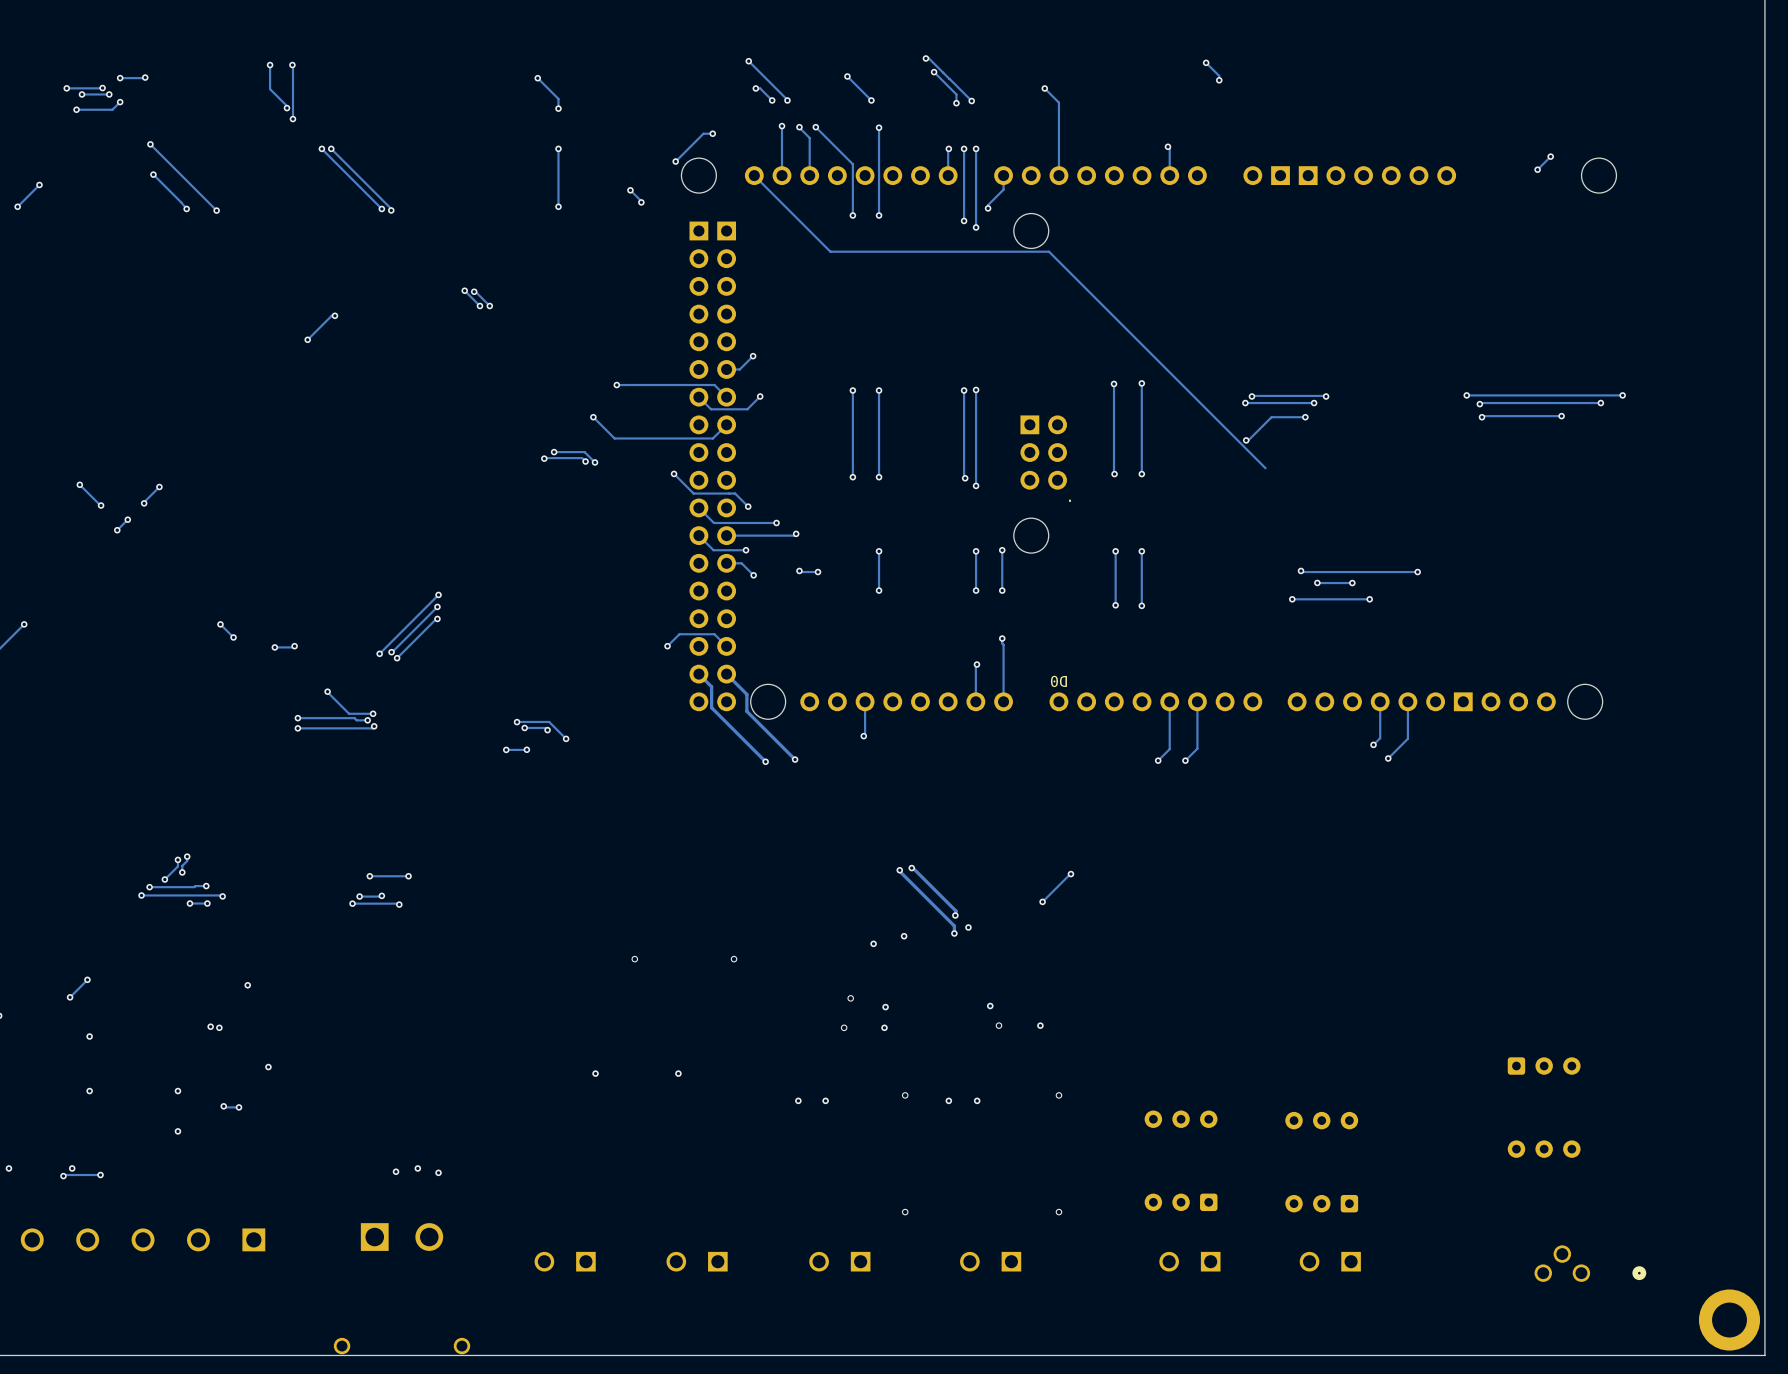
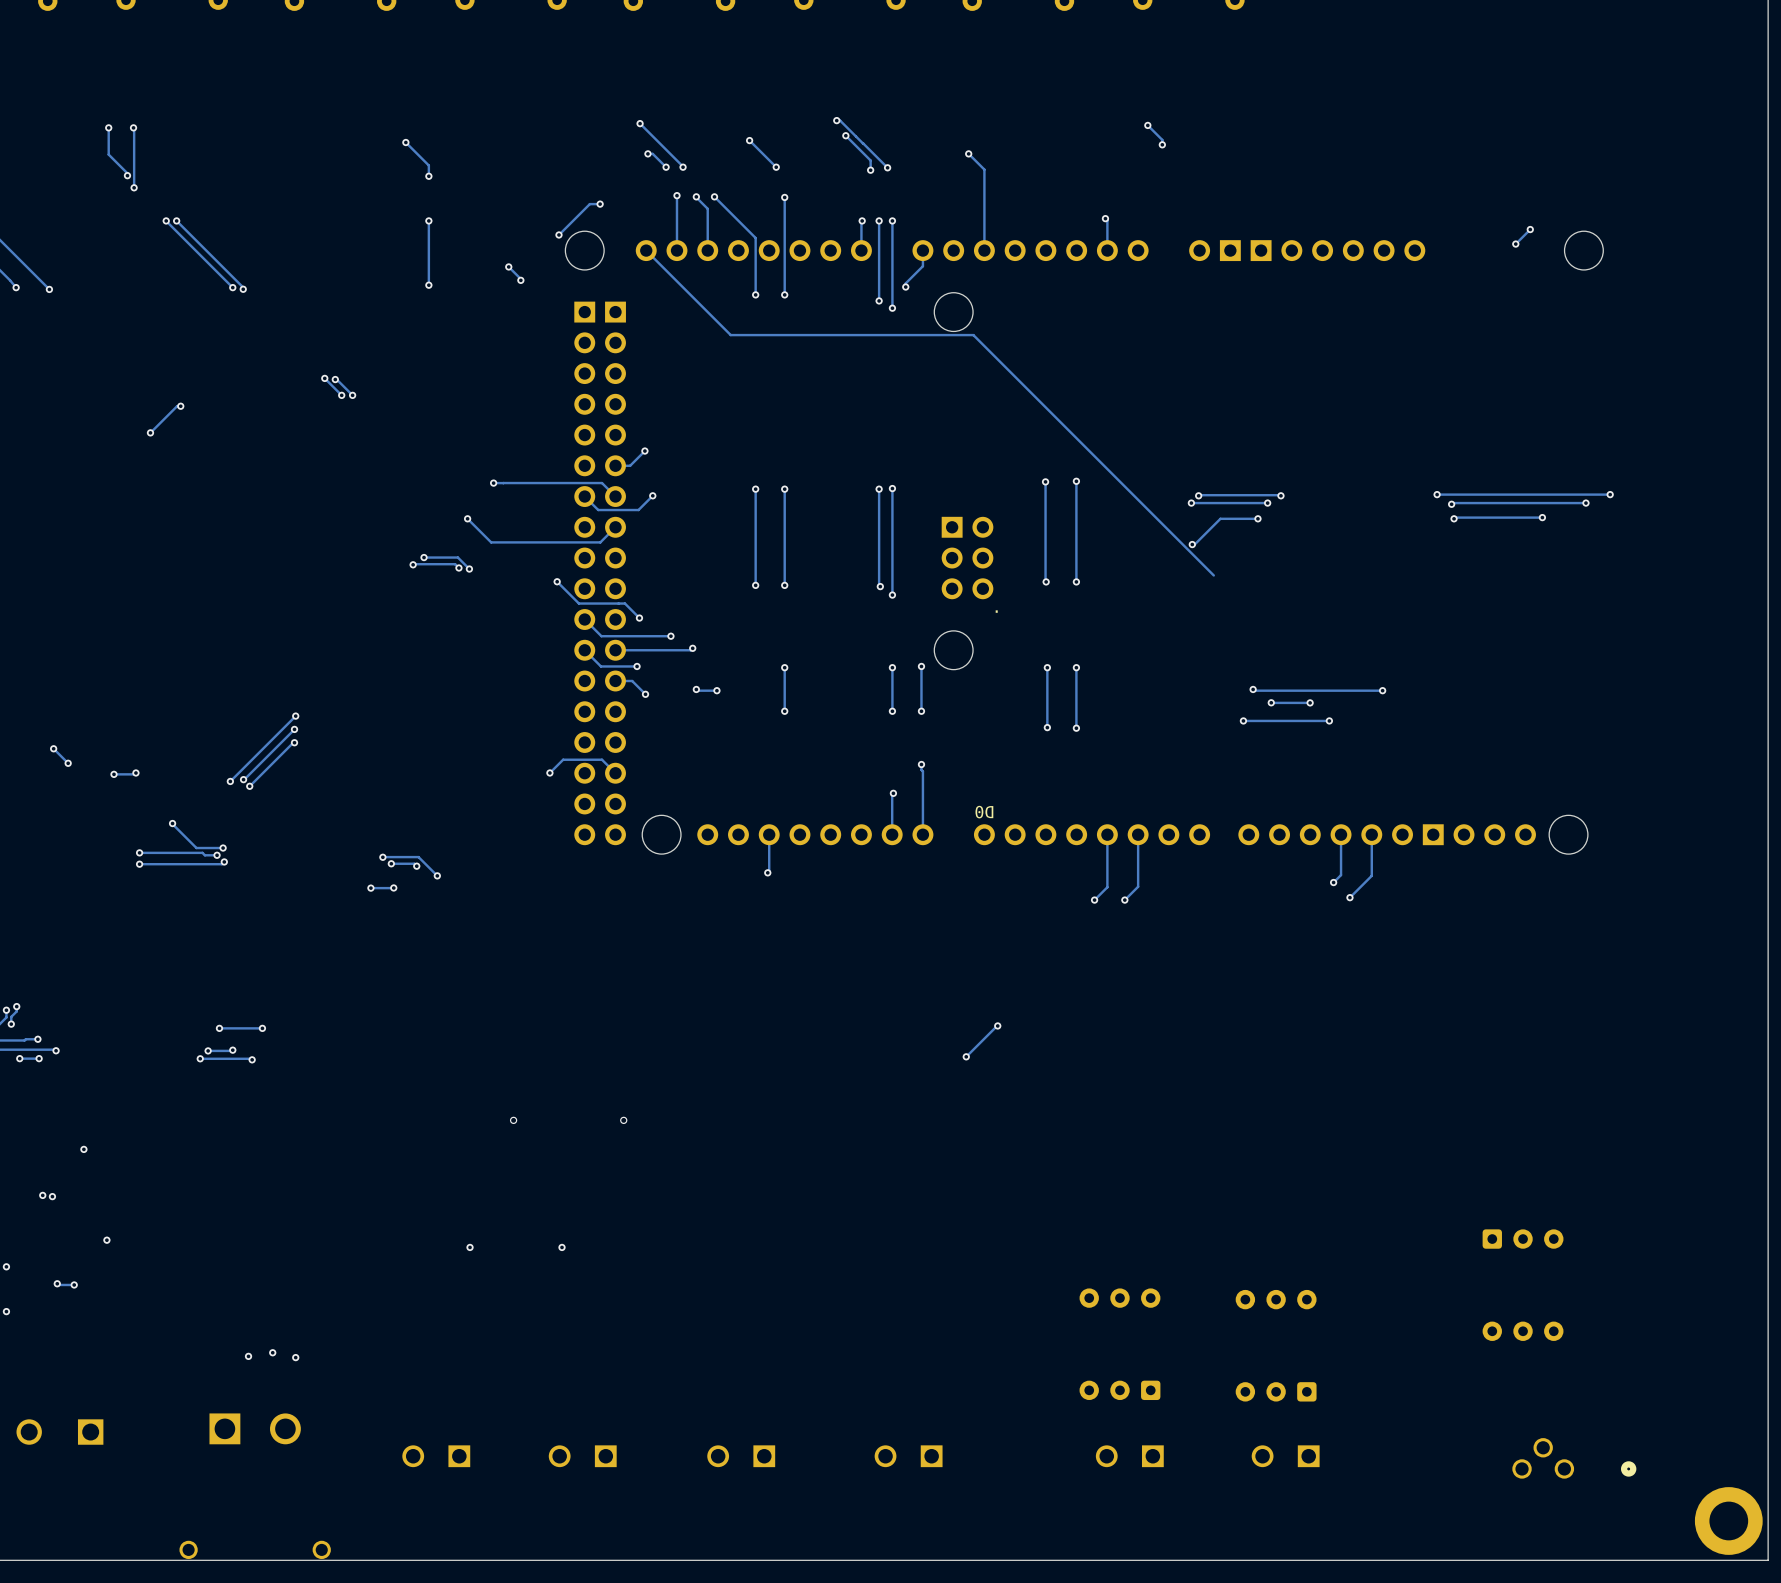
track: (698, 674) (711, 686) (711, 707) (765, 761) -> none
track: (726, 674) (746, 694) (746, 711) (795, 759) -> none
via: (795, 759) -> none
via: (765, 761) -> none
track: (911, 868) (955, 910) (955, 915) -> none
via: (911, 868) -> none
track: (899, 870) (954, 925) (954, 933) -> none
via: (899, 870) -> none
via: (955, 915) -> none
via: (968, 927) -> none
via: (954, 933) -> none
via: (904, 936) -> none
via: (873, 943) -> none
via: (850, 998) -> none
via: (990, 1006) -> none
via: (885, 1007) -> none
via: (998, 1025) -> none
via: (1040, 1025) -> none
via: (844, 1027) -> none
via: (884, 1027) -> none
via: (905, 1095) -> none
via: (1058, 1095) -> none
via: (798, 1100) -> none
via: (825, 1100) -> none
via: (948, 1100) -> none
via: (977, 1100) -> none
via: (905, 1212) -> none
via: (1058, 1212) -> none

